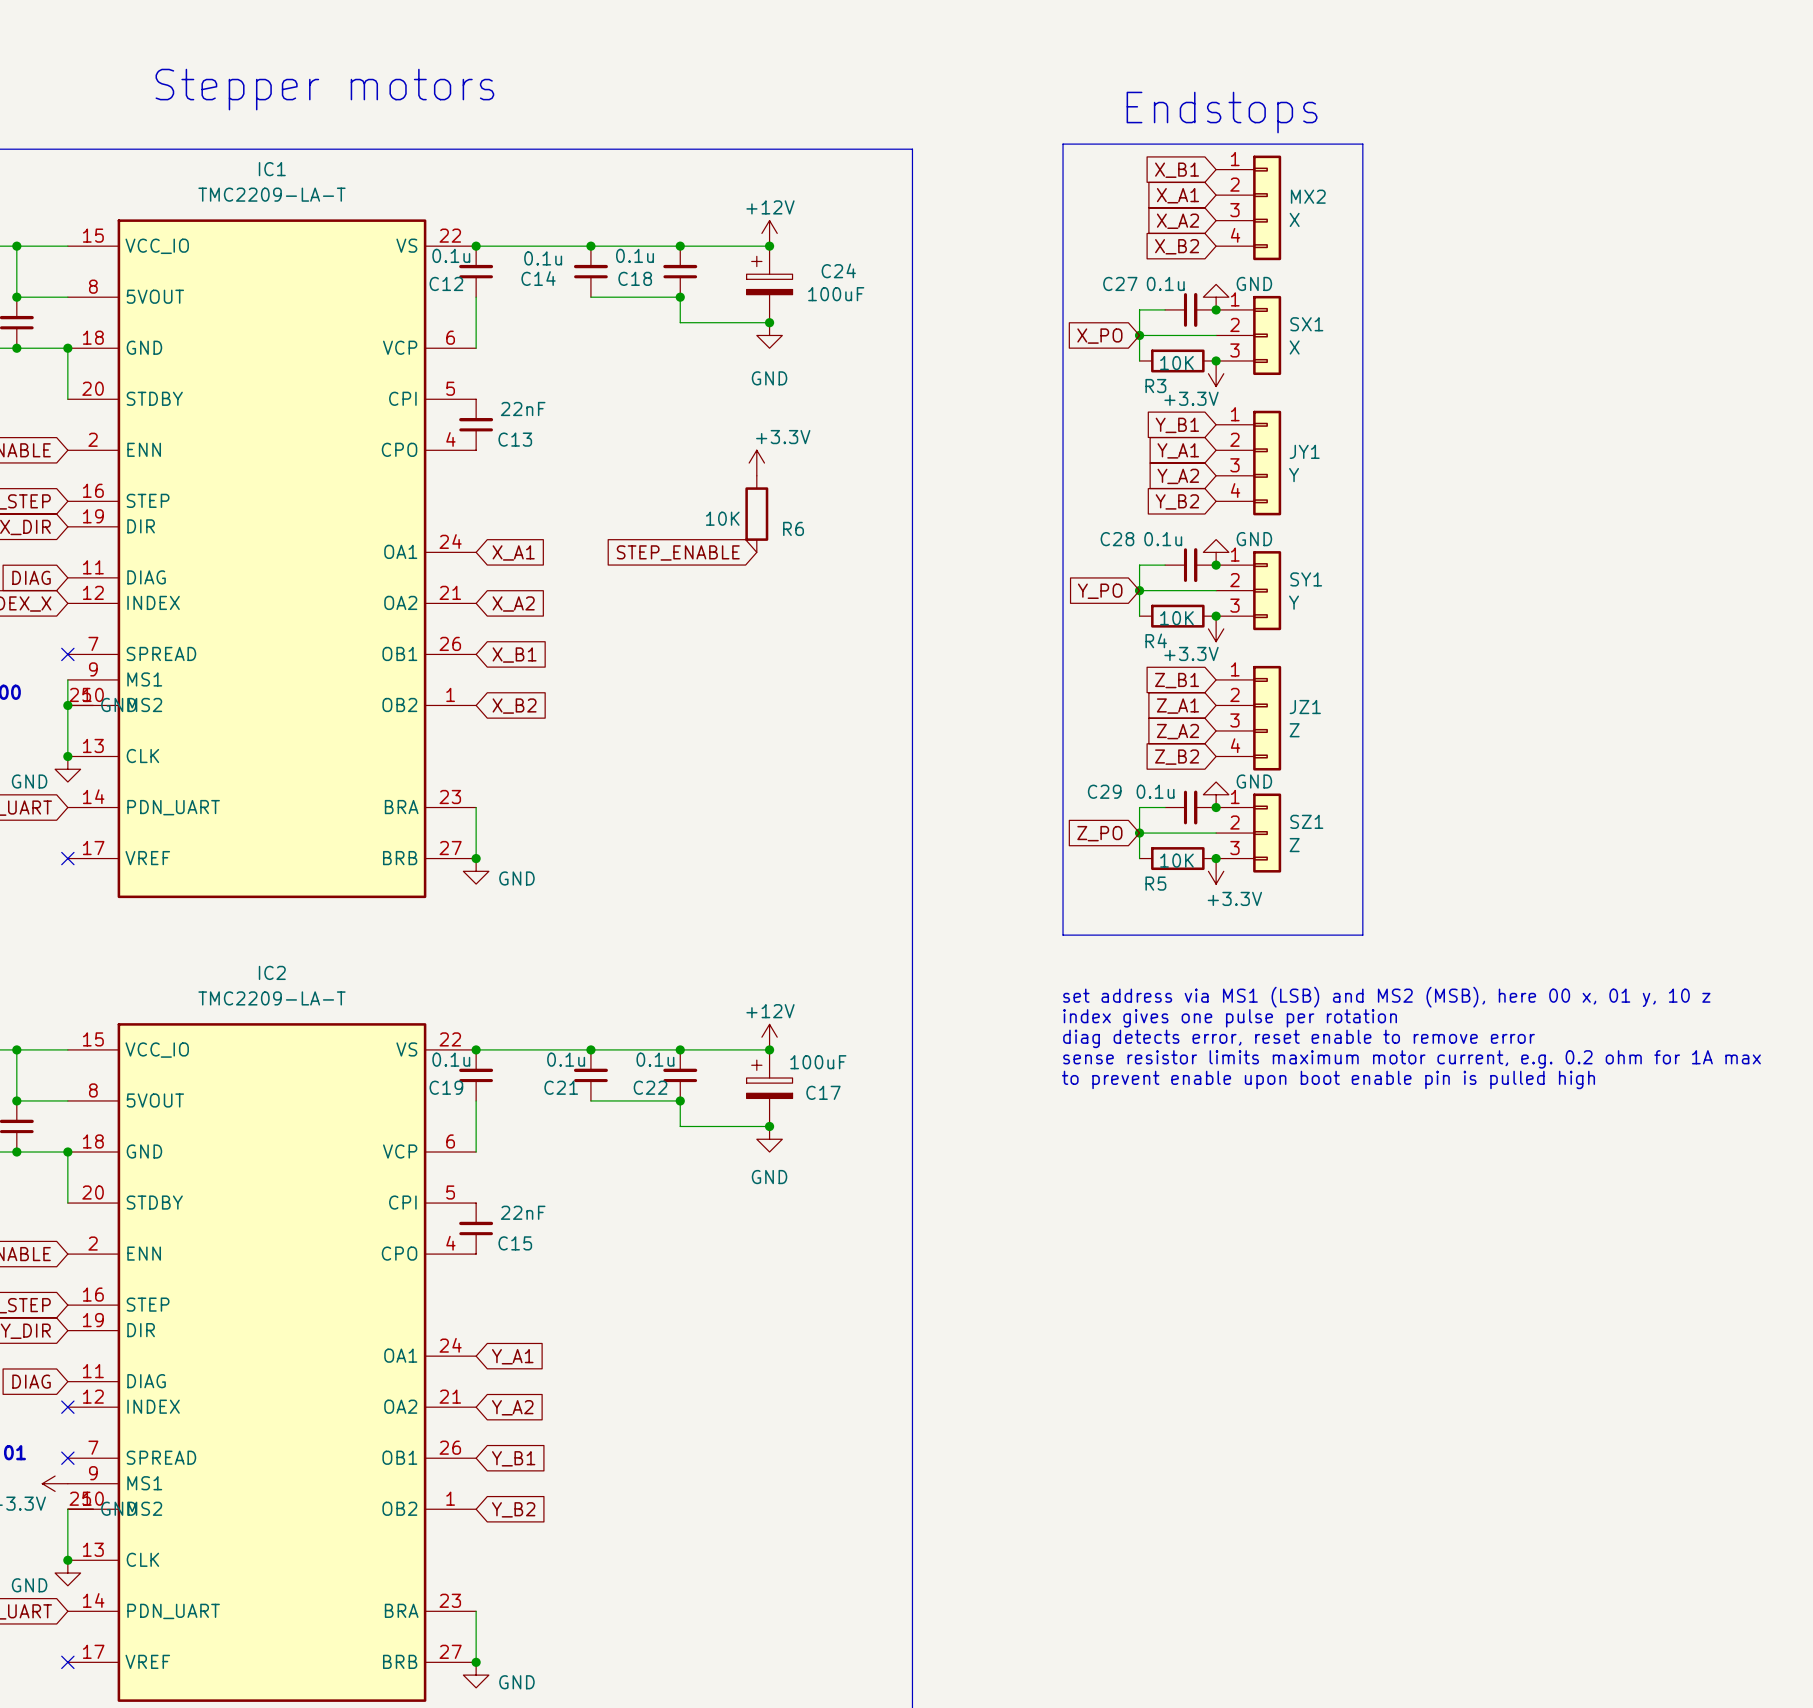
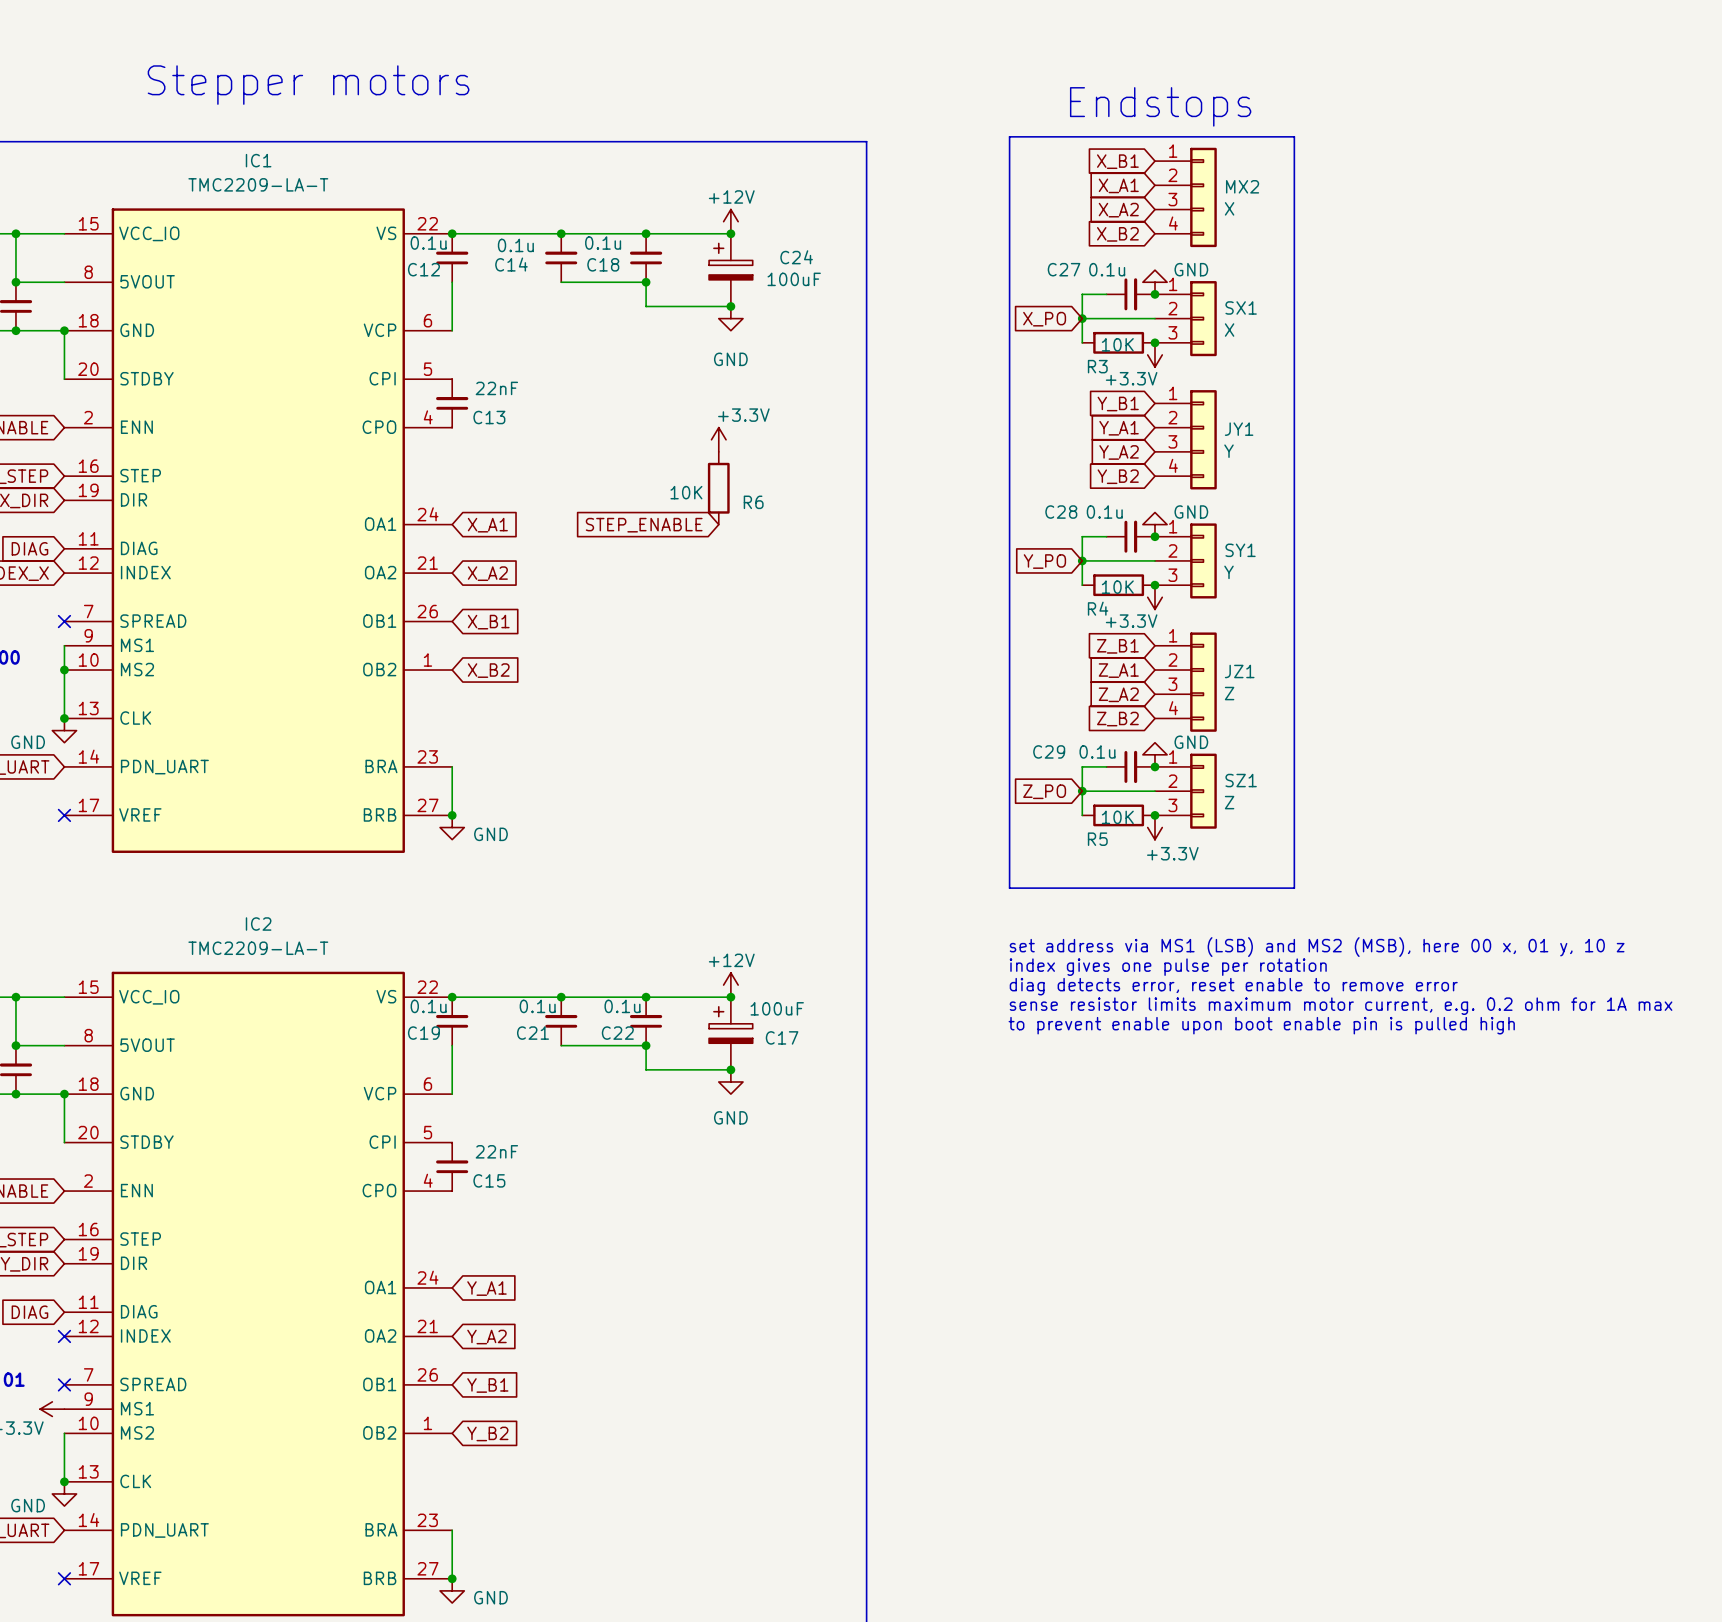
IC1 symbol: [67, 219, 477, 899] -> [64, 208, 453, 853]
IC2 symbol: [67, 1023, 477, 1702] -> [64, 971, 453, 1617]

